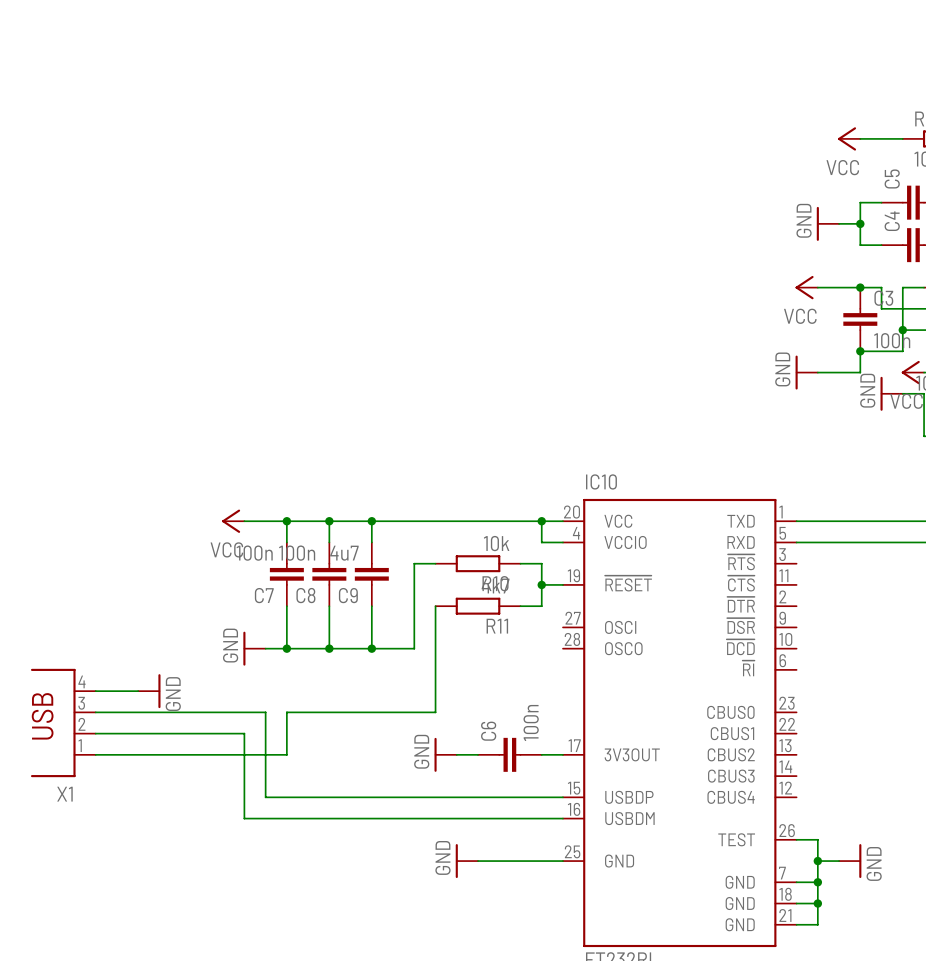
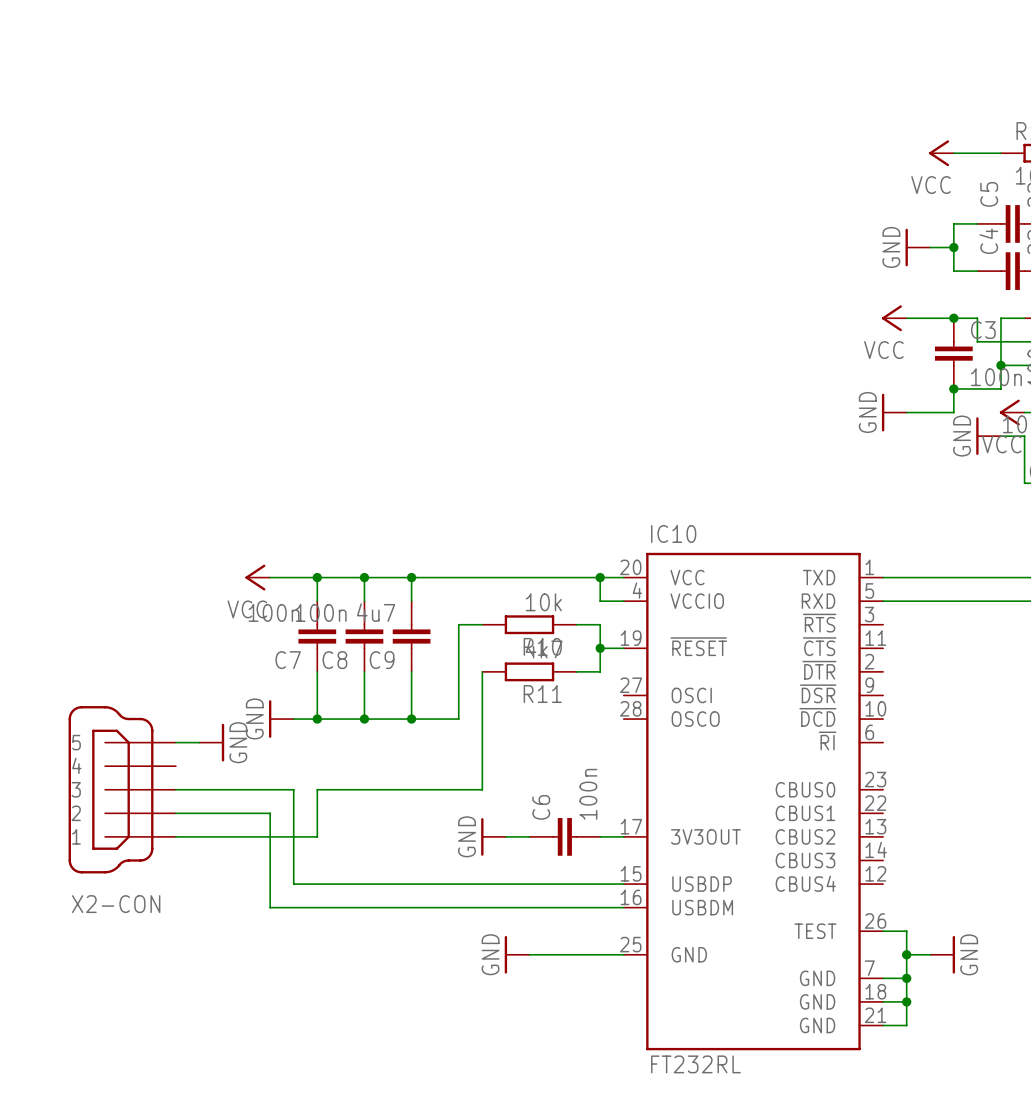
wire: none -> (175, 742) (199, 742)
power symbol position: GND (149, 691) -> GND (211, 742)
X2-CON: none -> (122, 789)
X1: (63, 723) -> none

